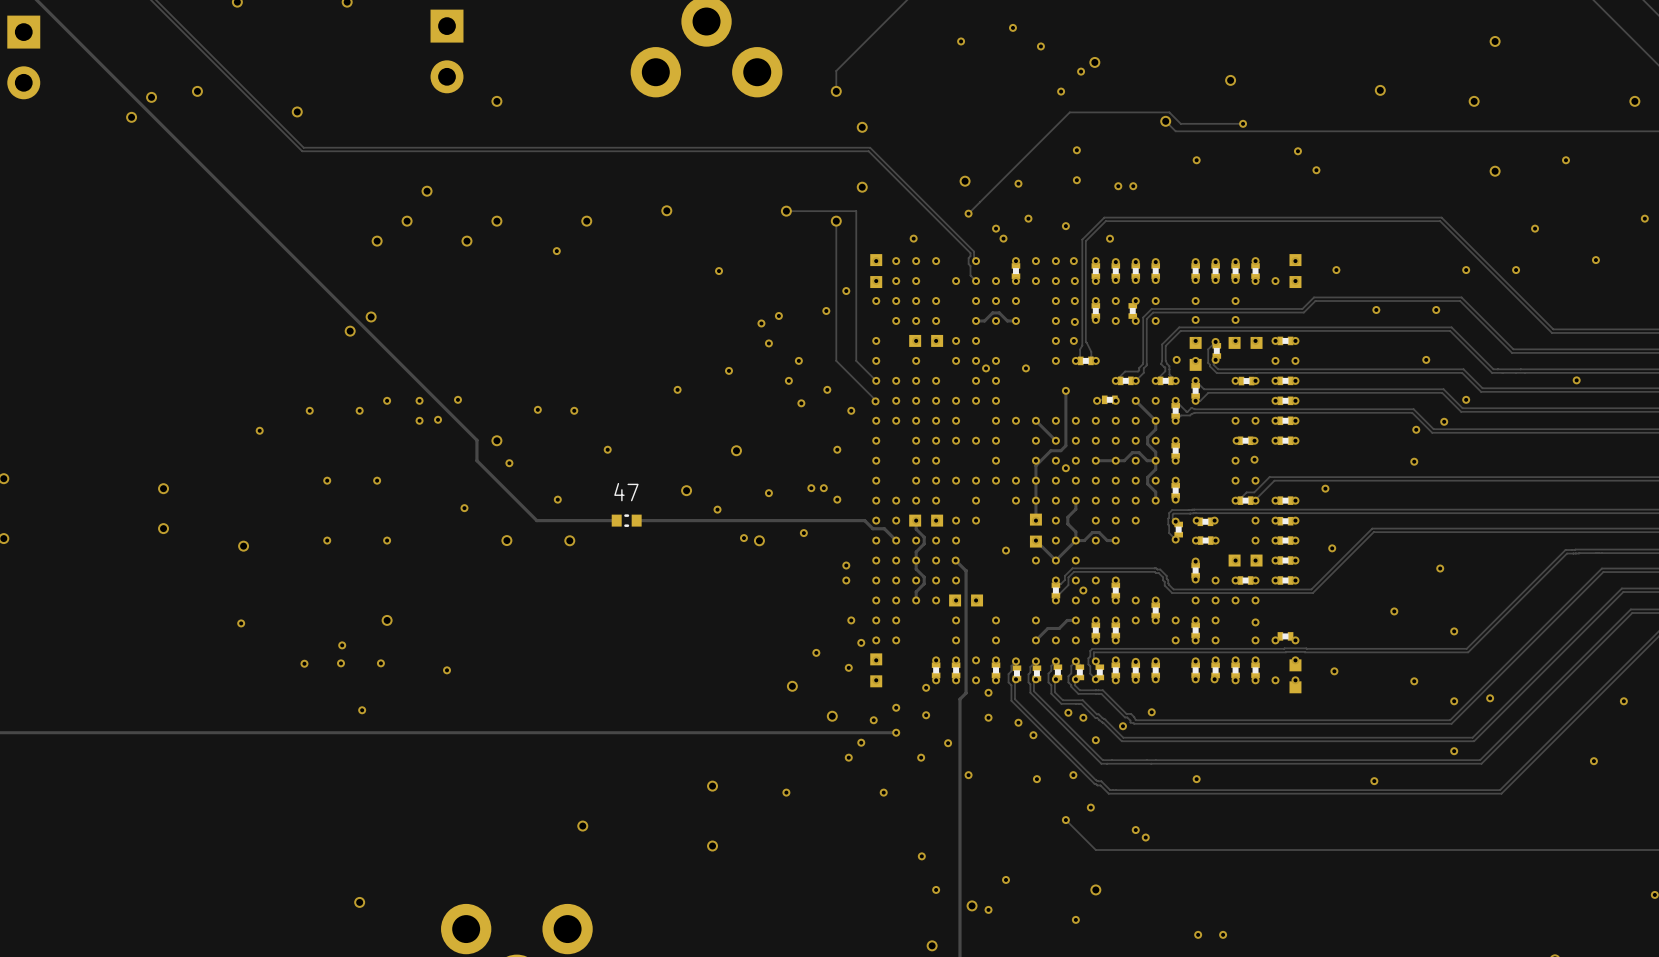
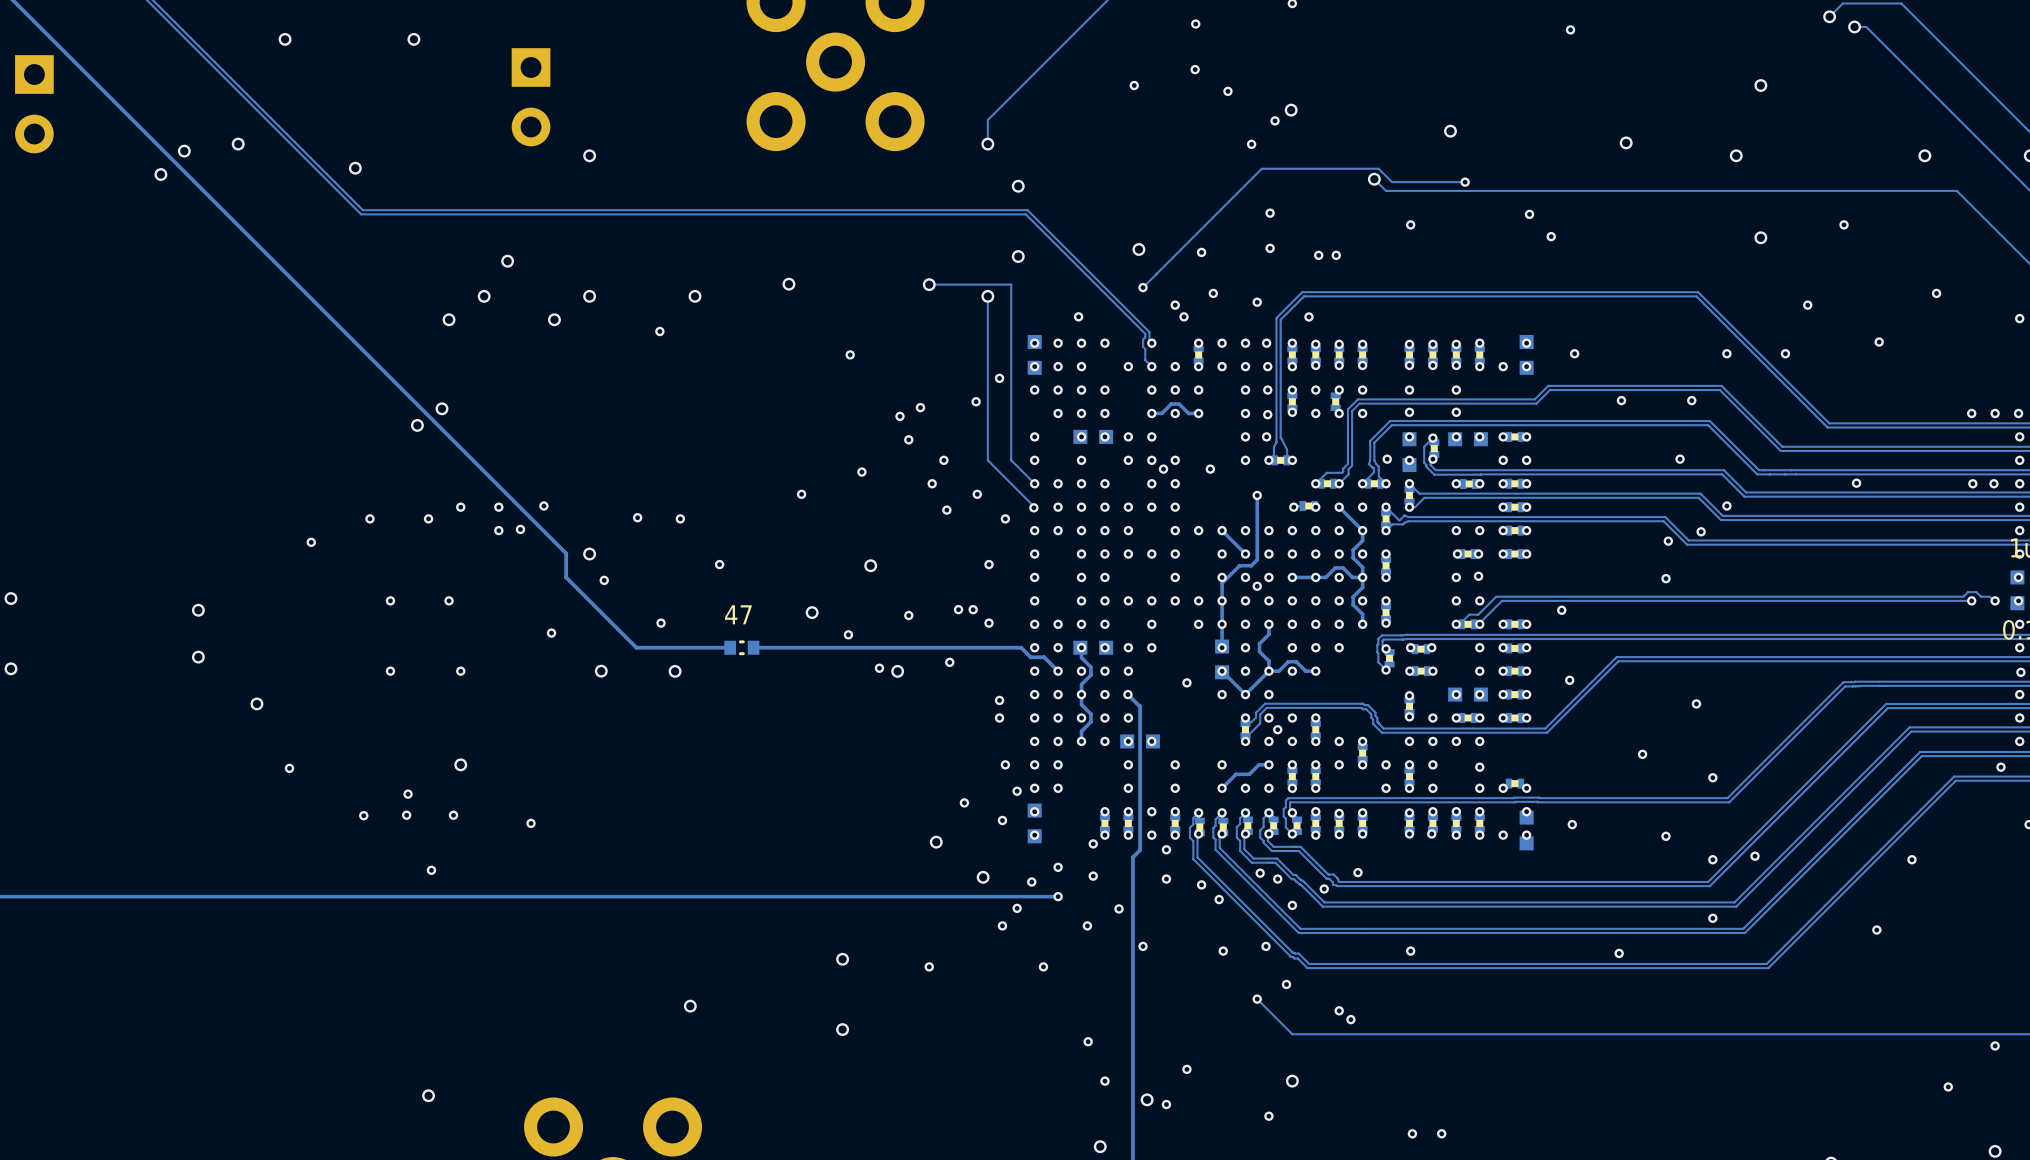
via position: (243, 546) -> (256, 703)

